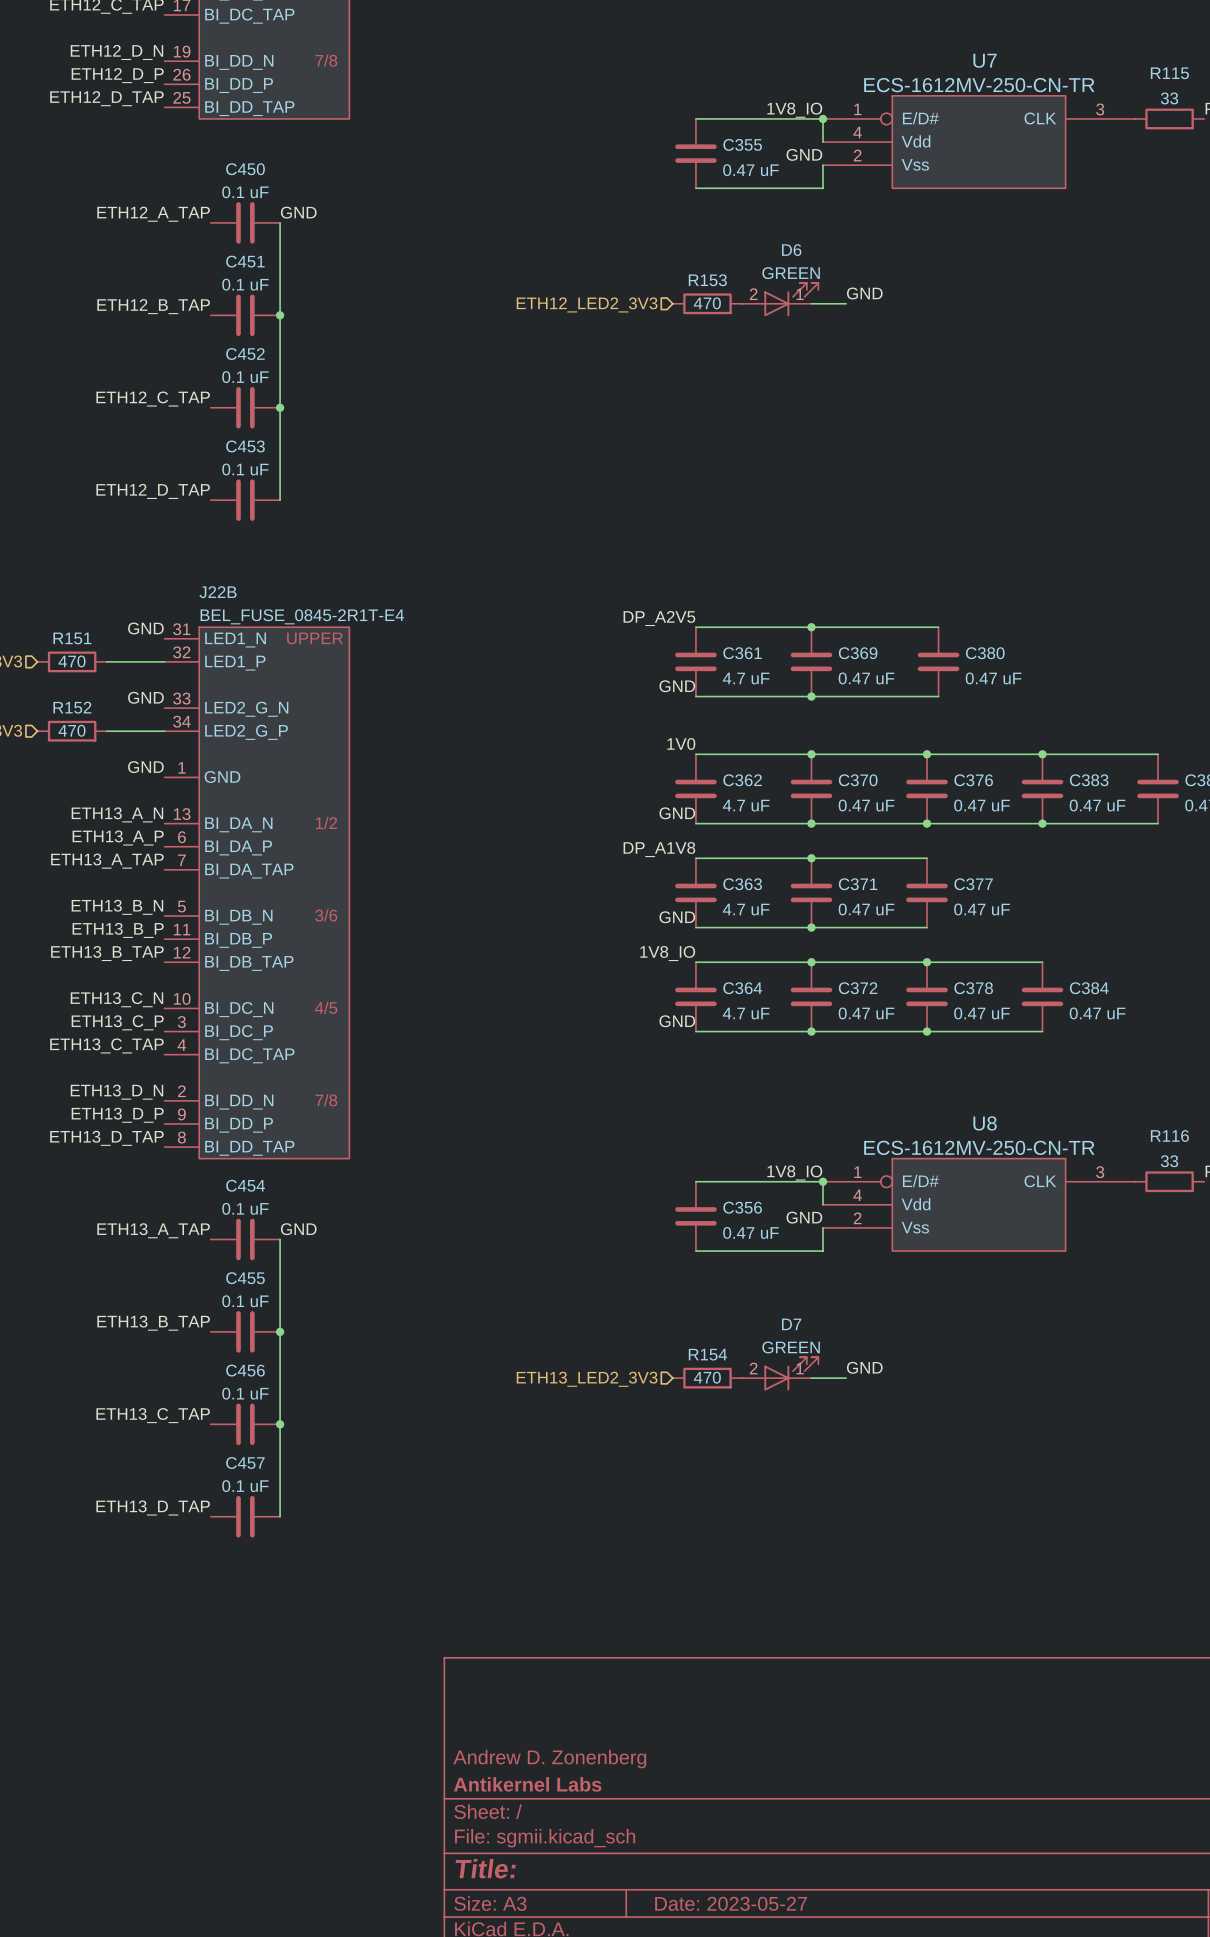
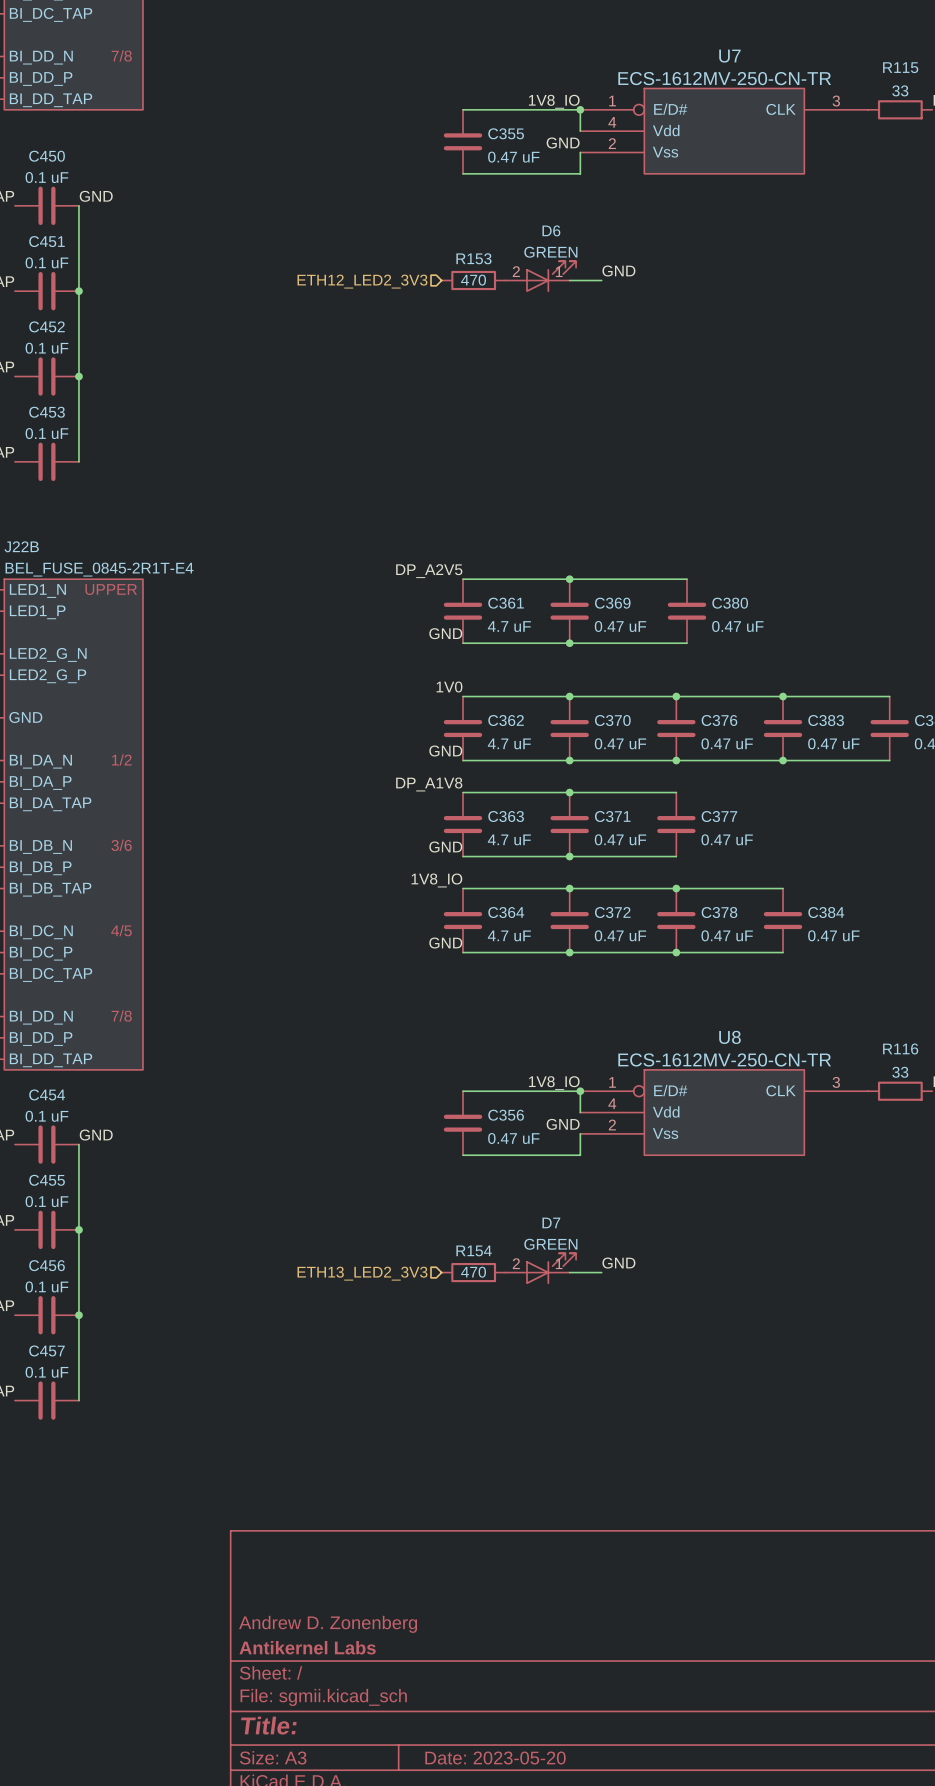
title block: Date: 2023-05-27 (731, 1903) -> Date: 2023-05-20 (495, 1758)

